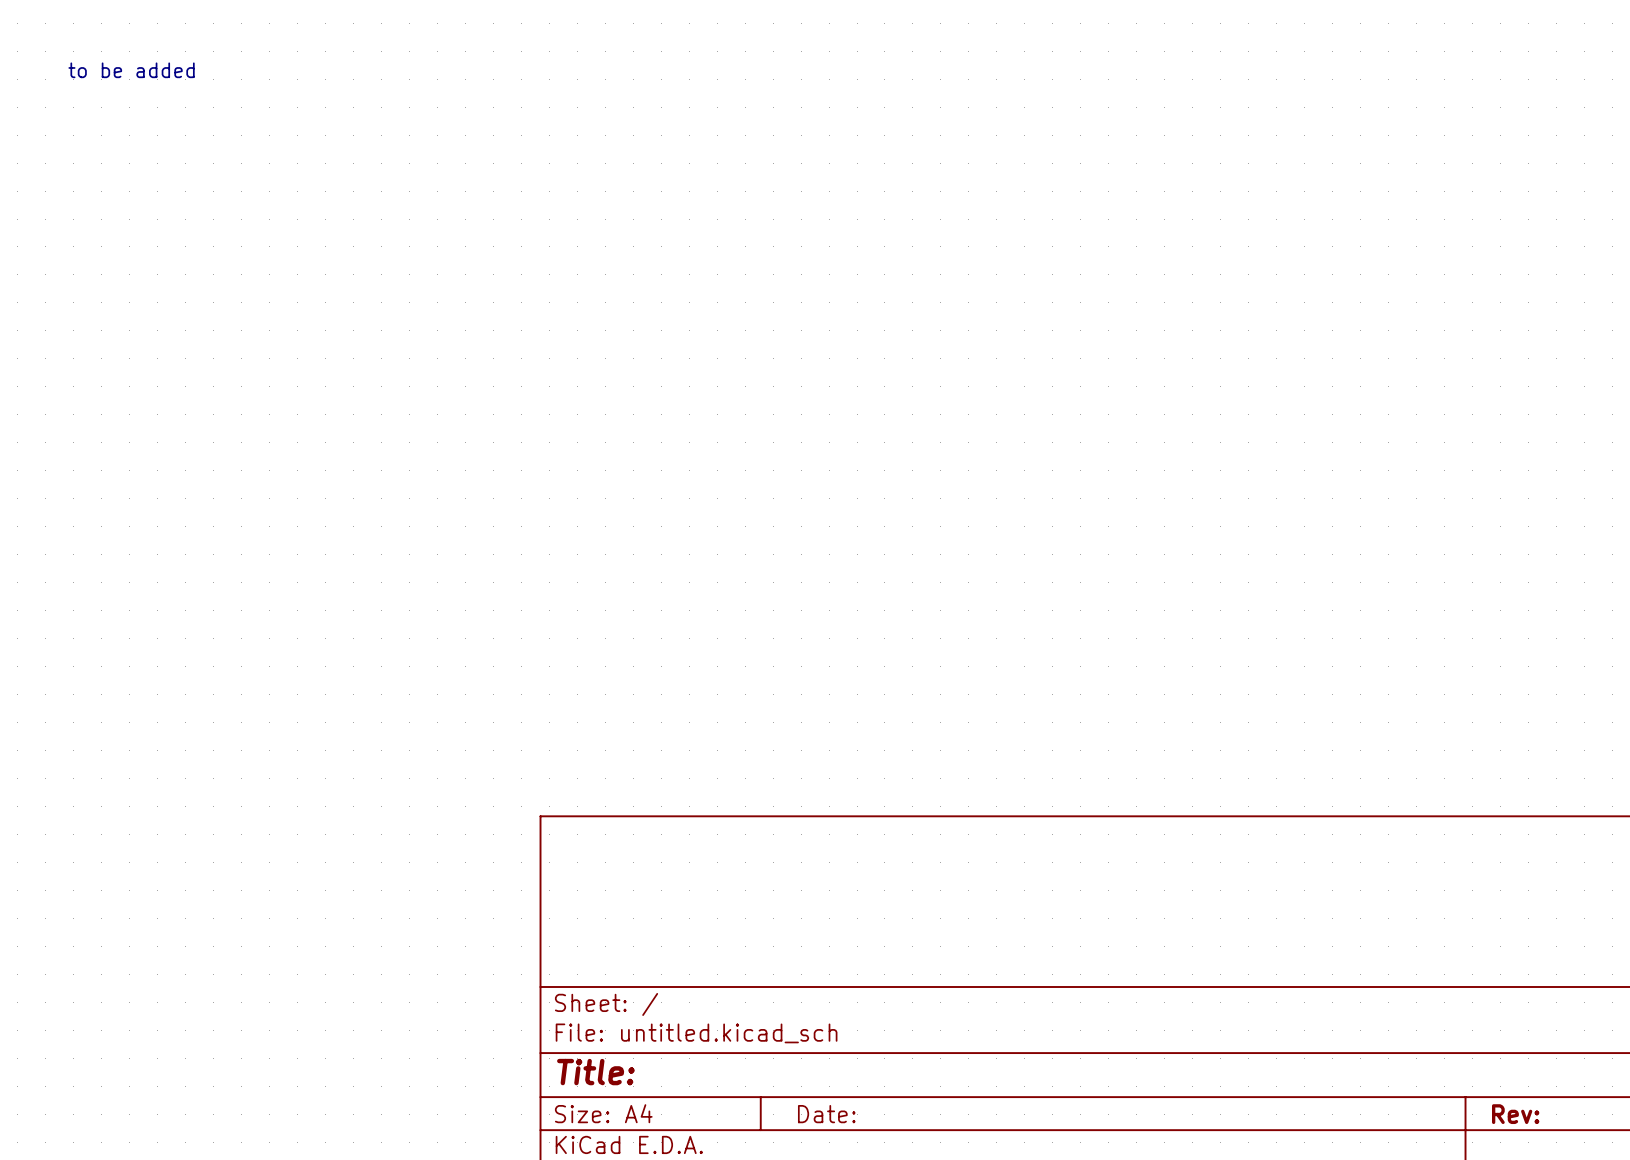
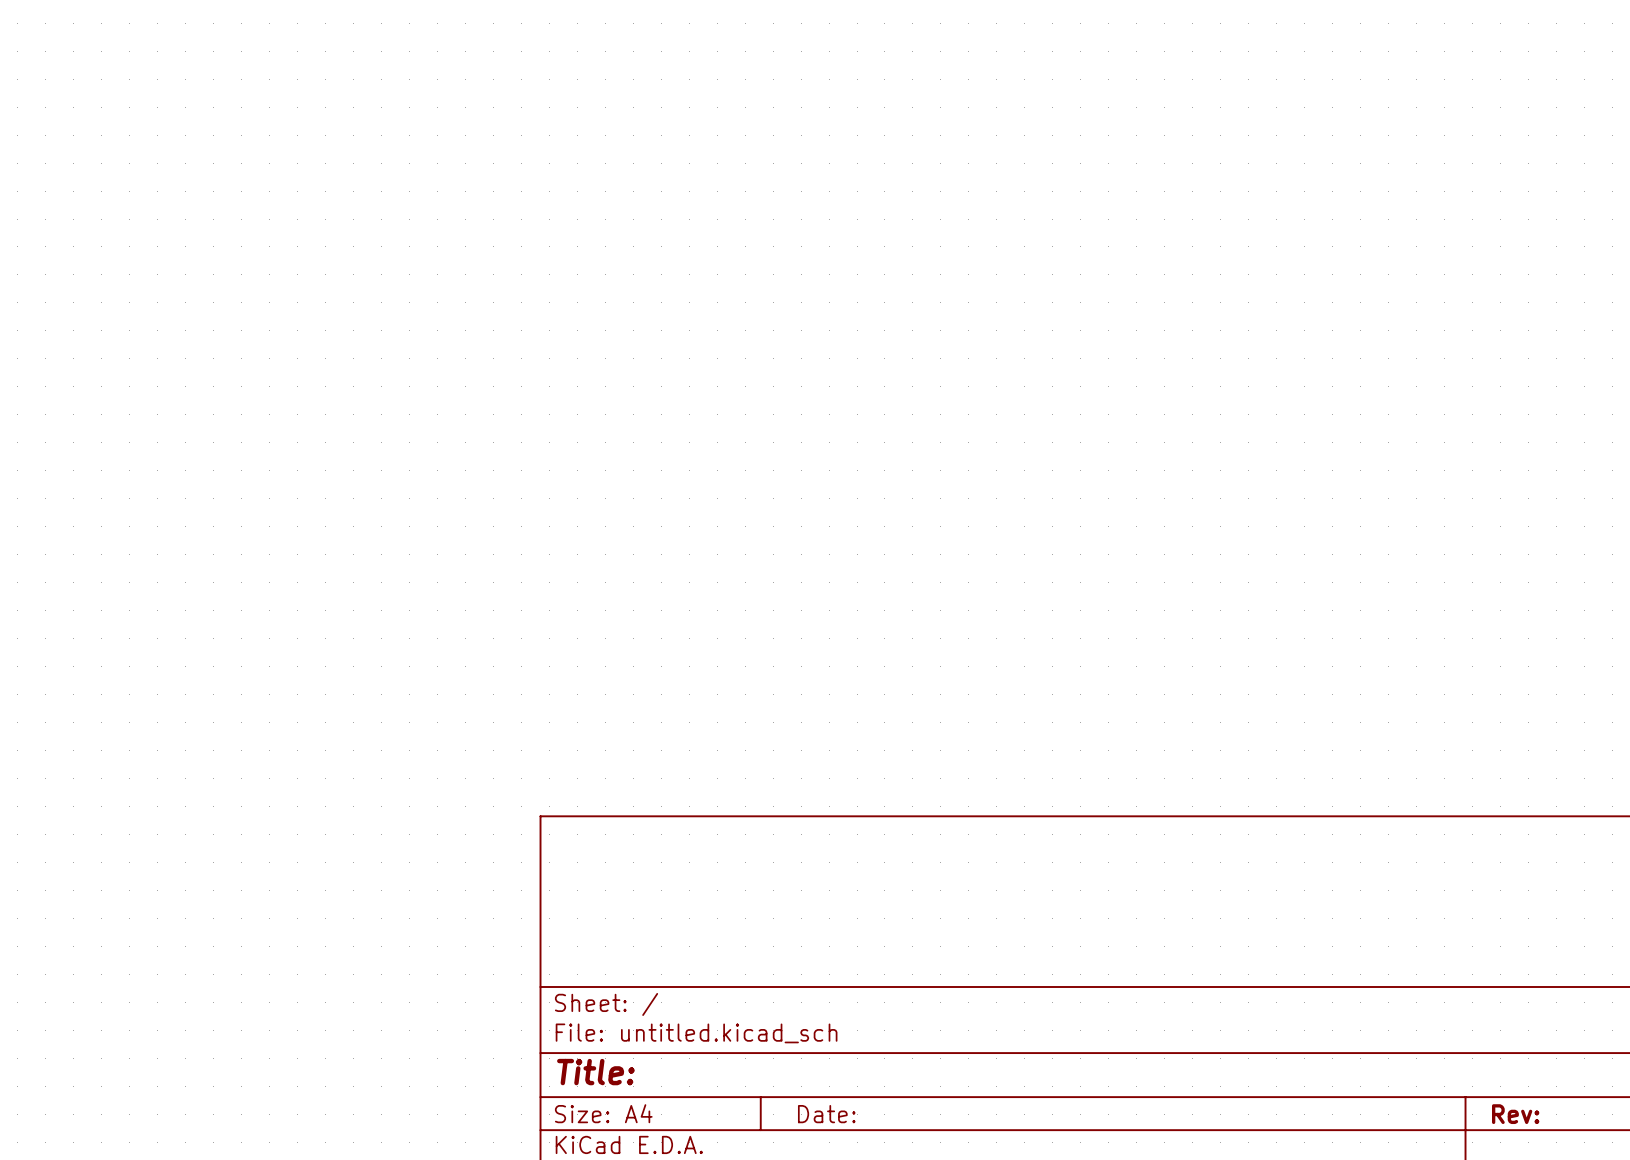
text: to be added (131, 70) -> none

